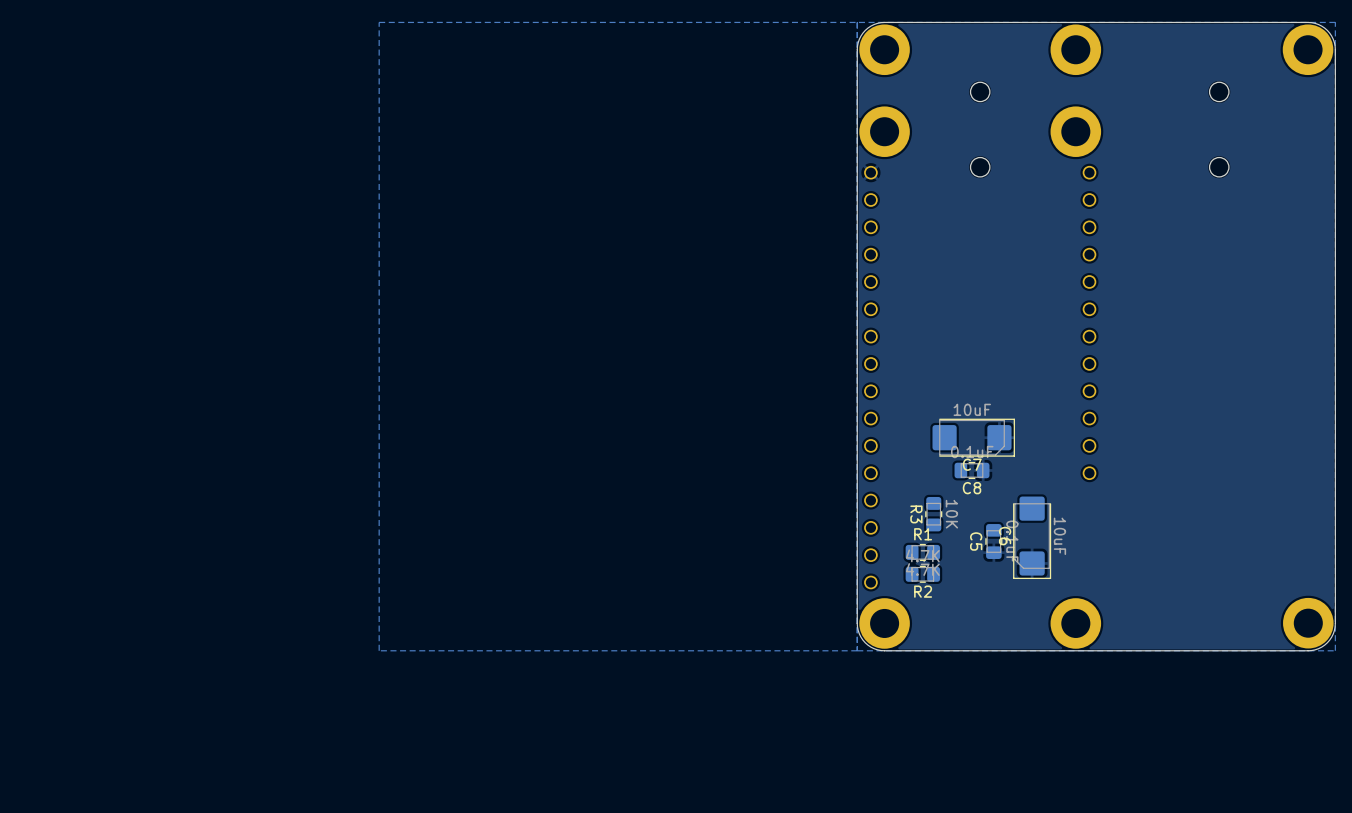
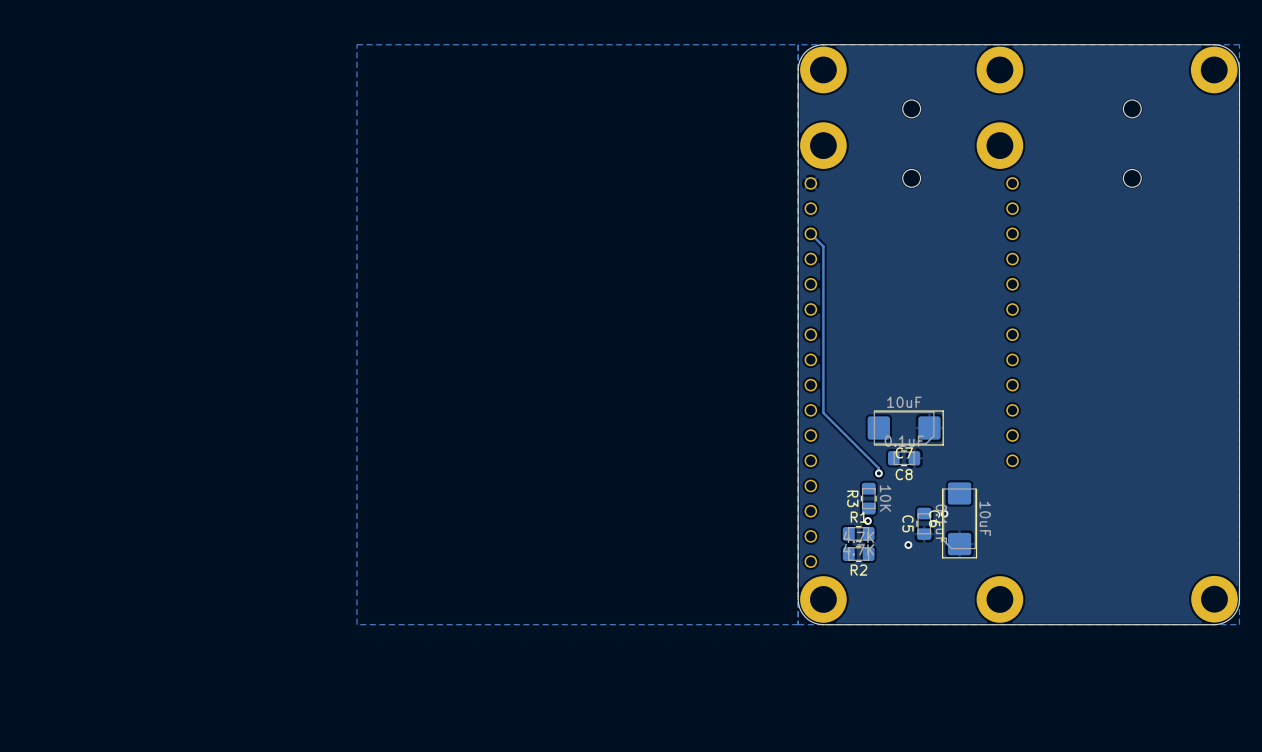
track: none -> (810, 233) (823, 246) (823, 412) (878, 468) (878, 473)
via: none -> (878, 473)
via: none -> (944, 513)
via: none -> (867, 521)
via: none -> (908, 545)

